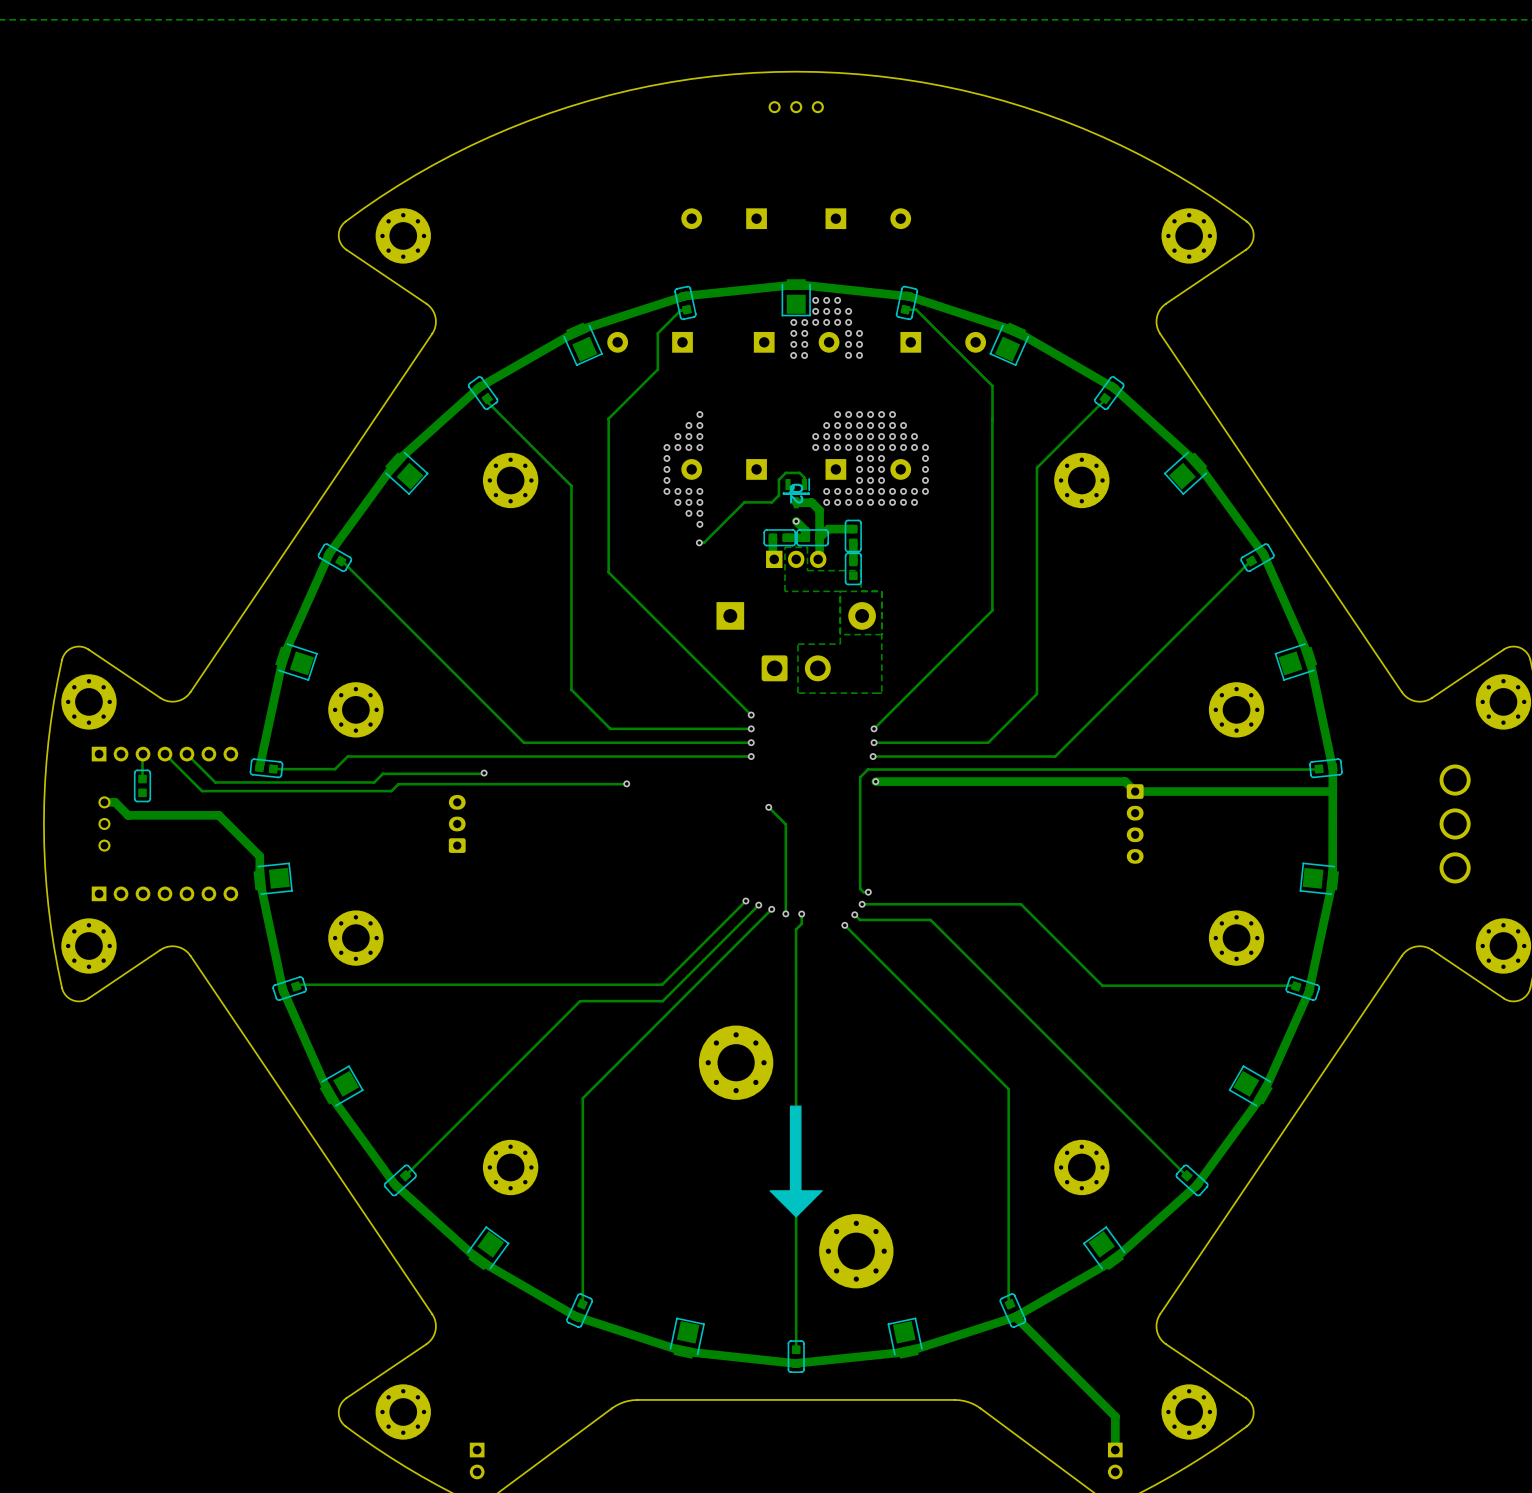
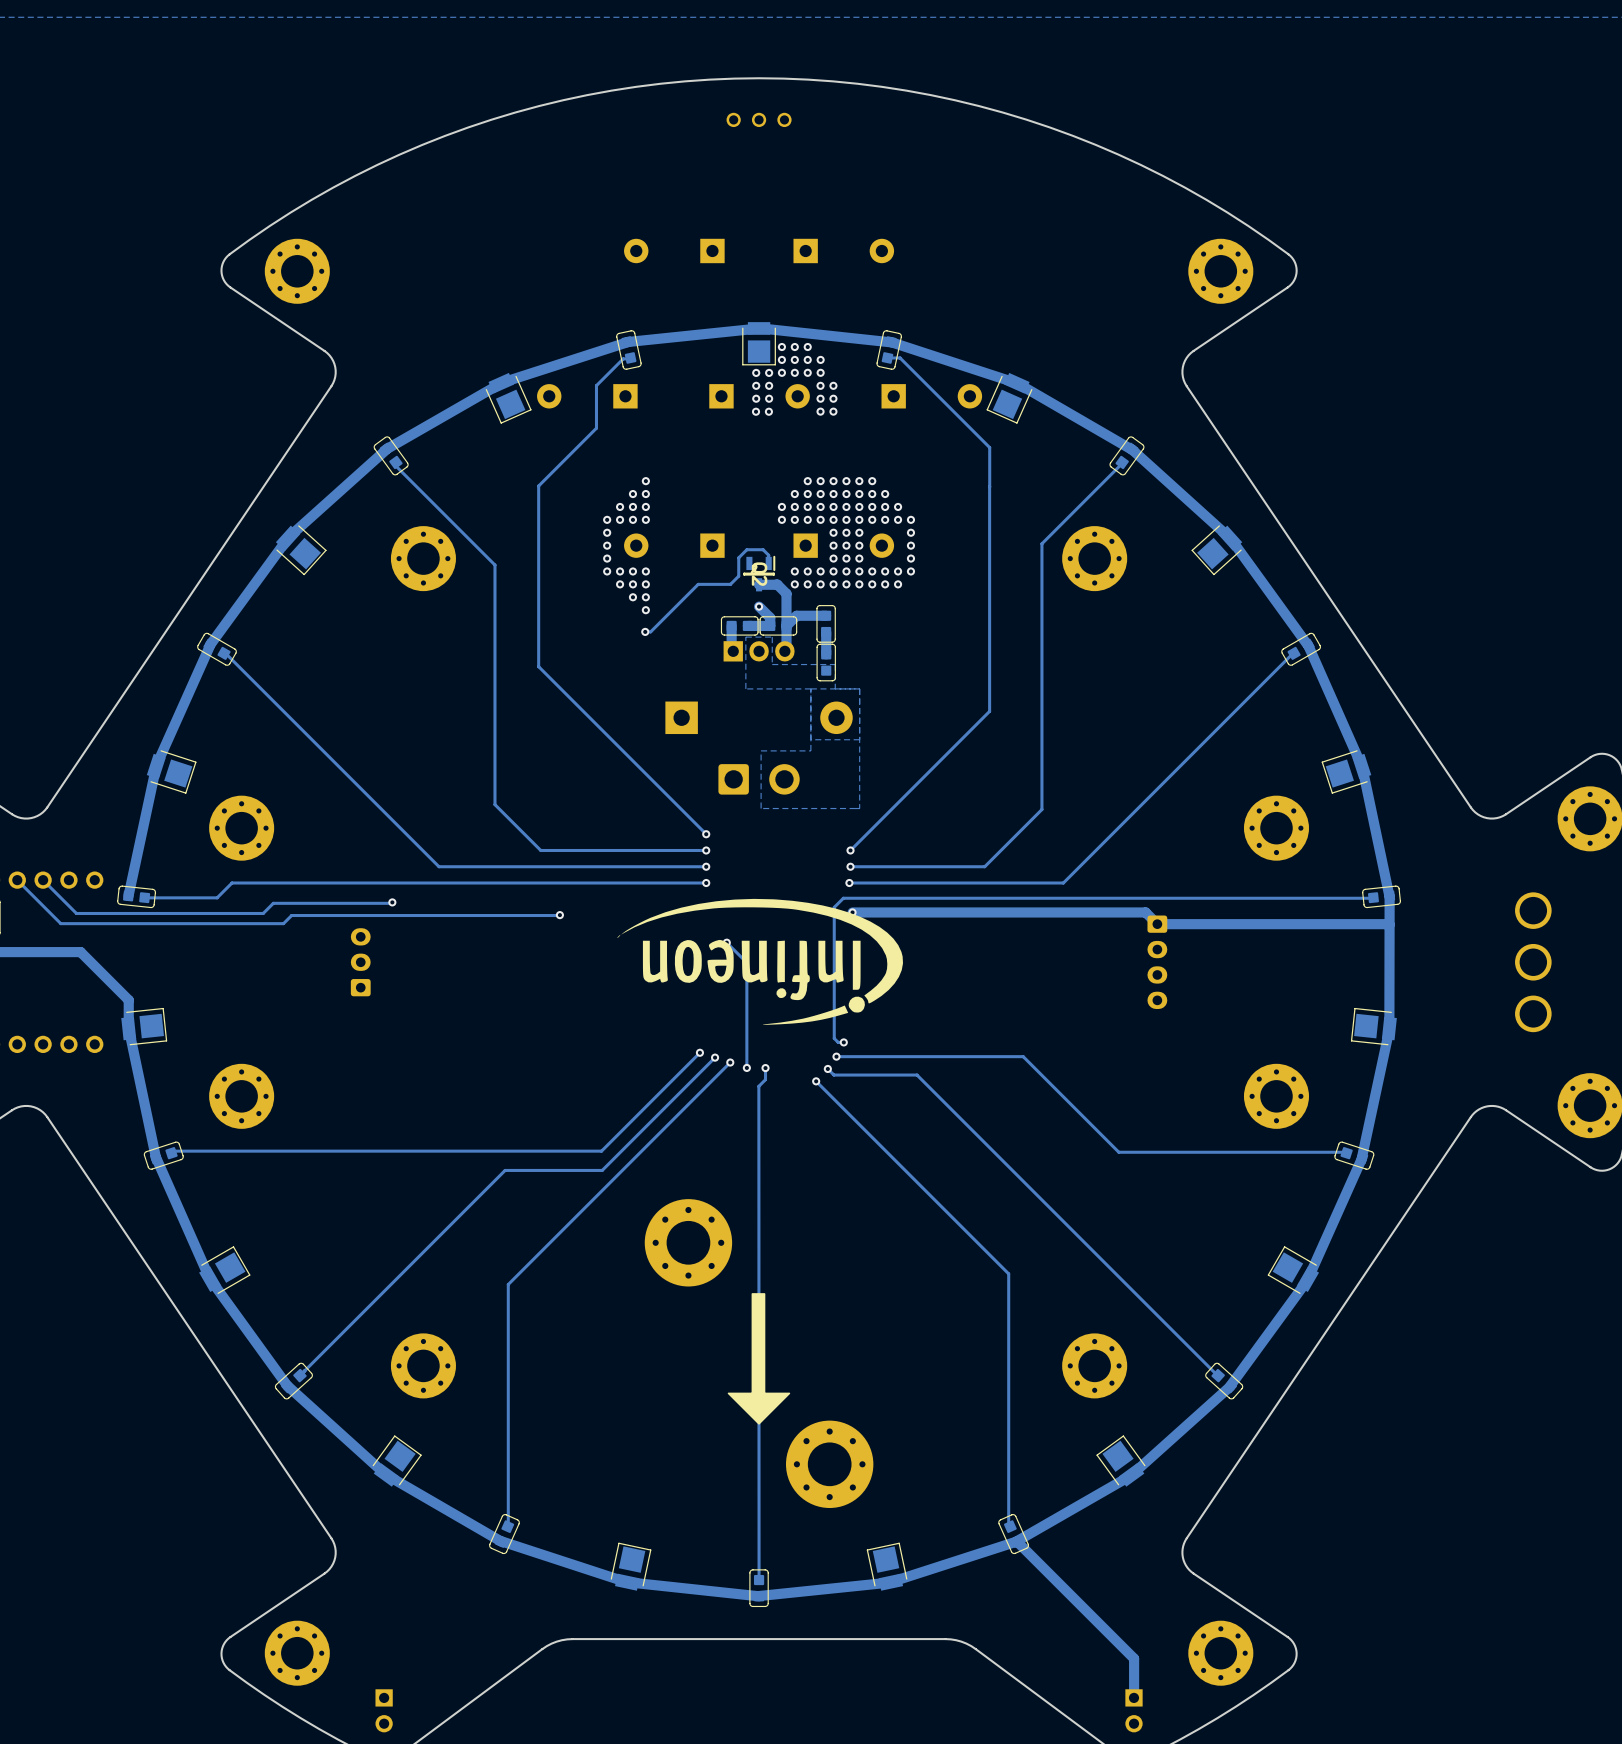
drawing: none -> [617, 898, 904, 1025]

